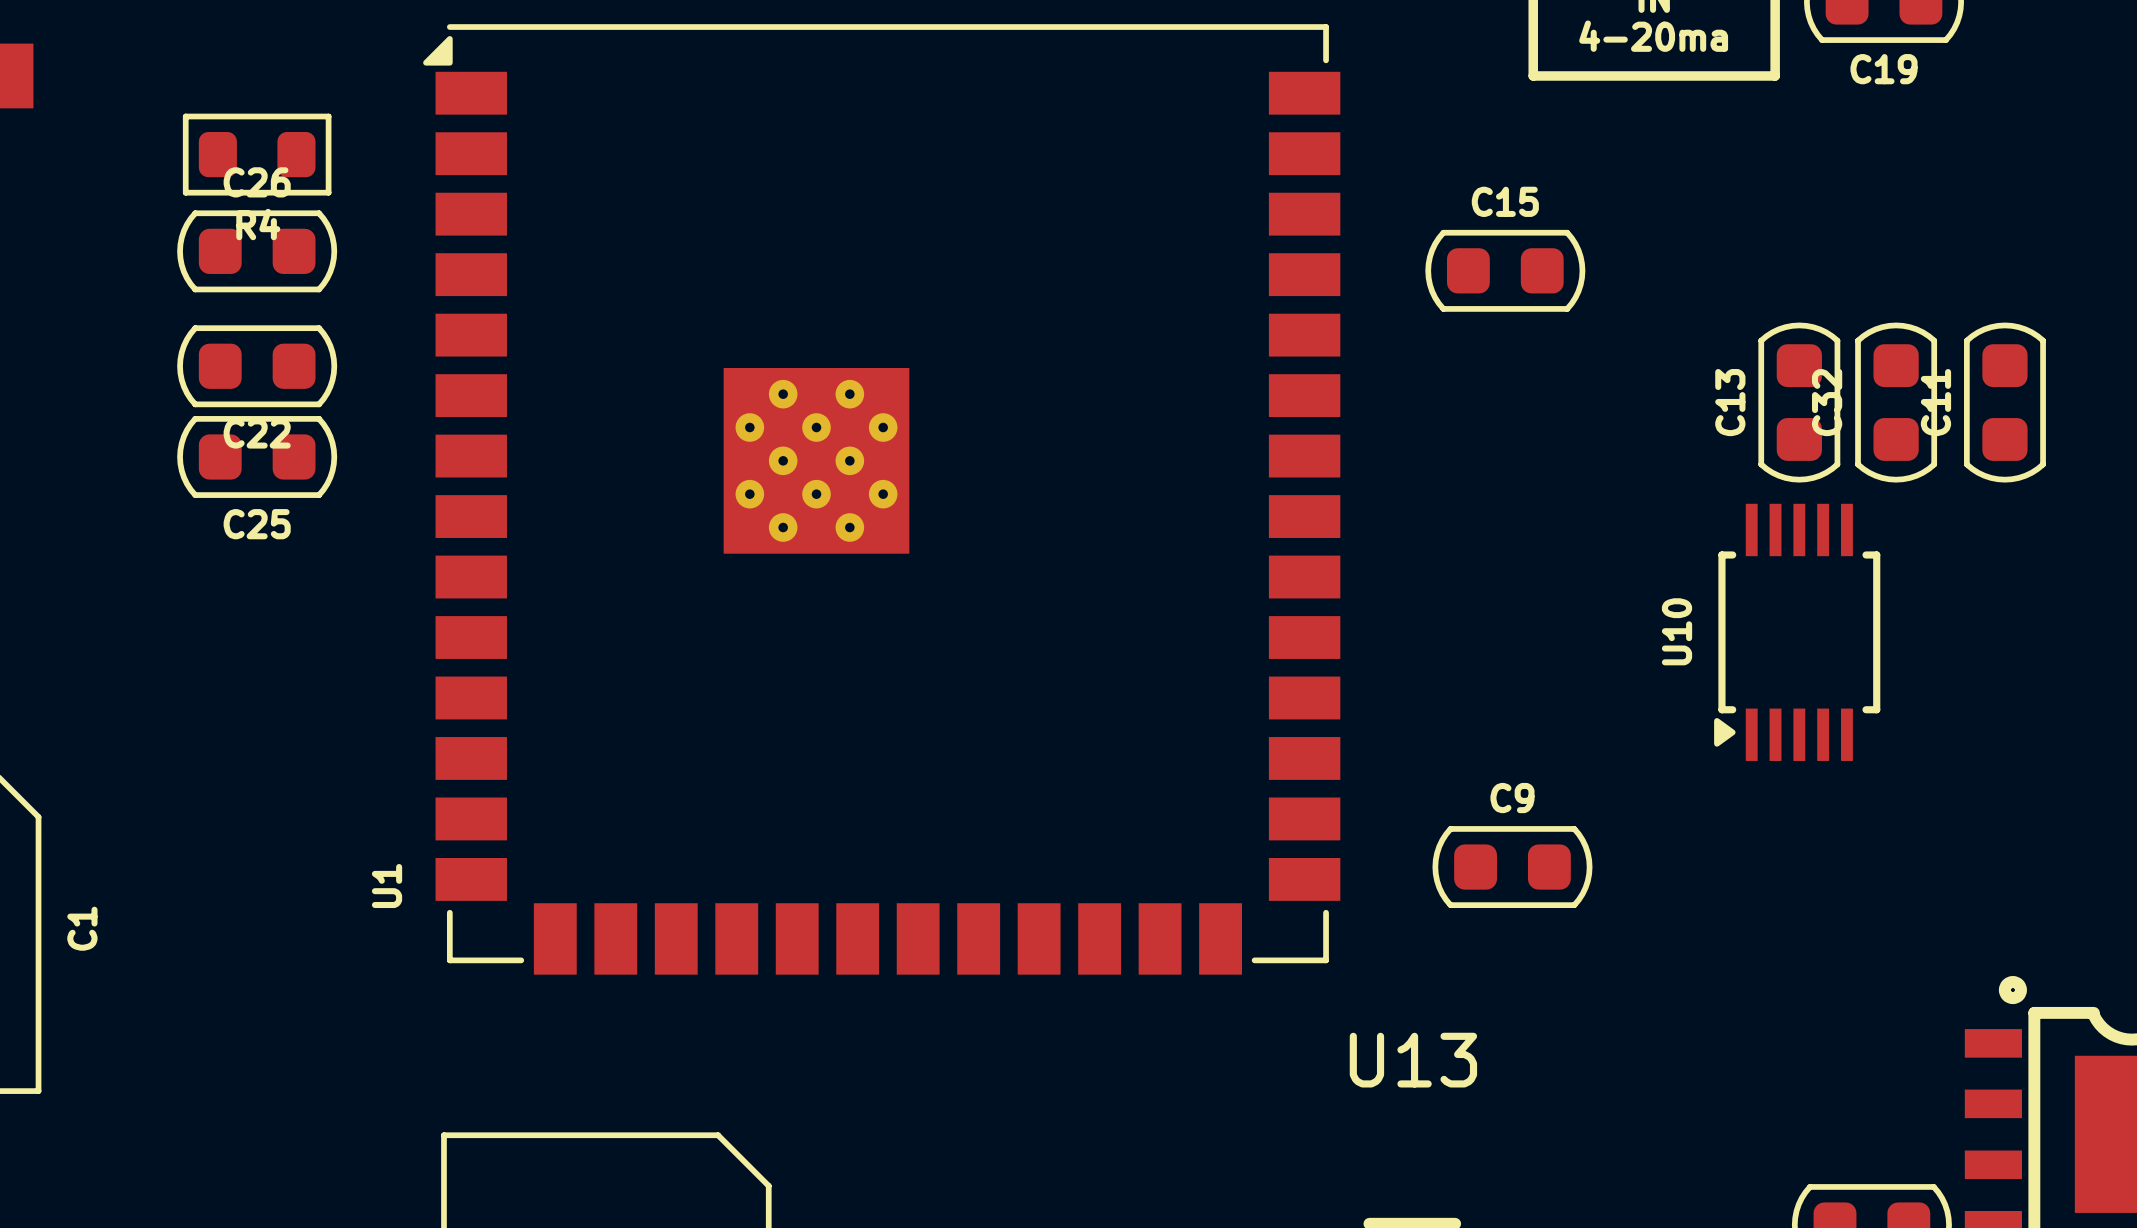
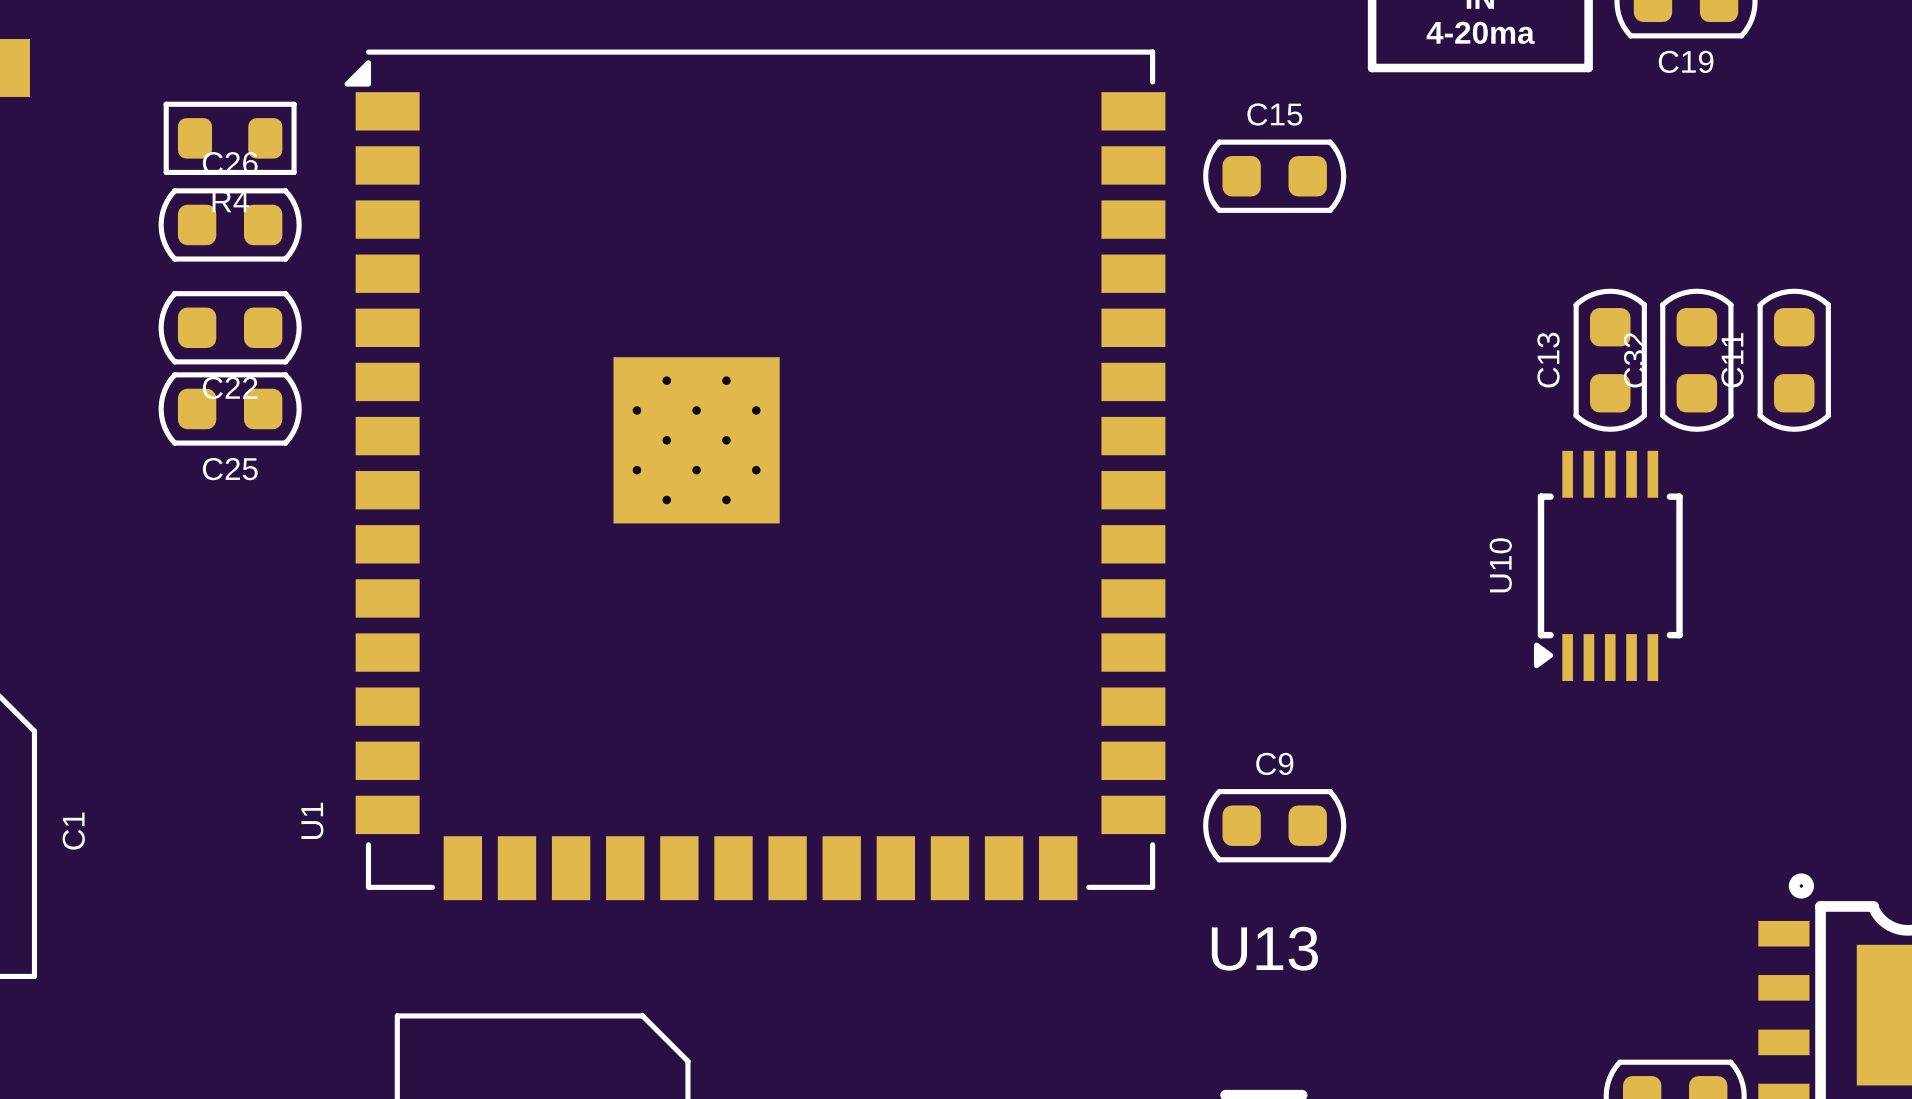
C15 position: (1505, 270) -> (1274, 176)
U1 position: (881, 499) -> (754, 474)
C9 position: (1512, 867) -> (1274, 825)

